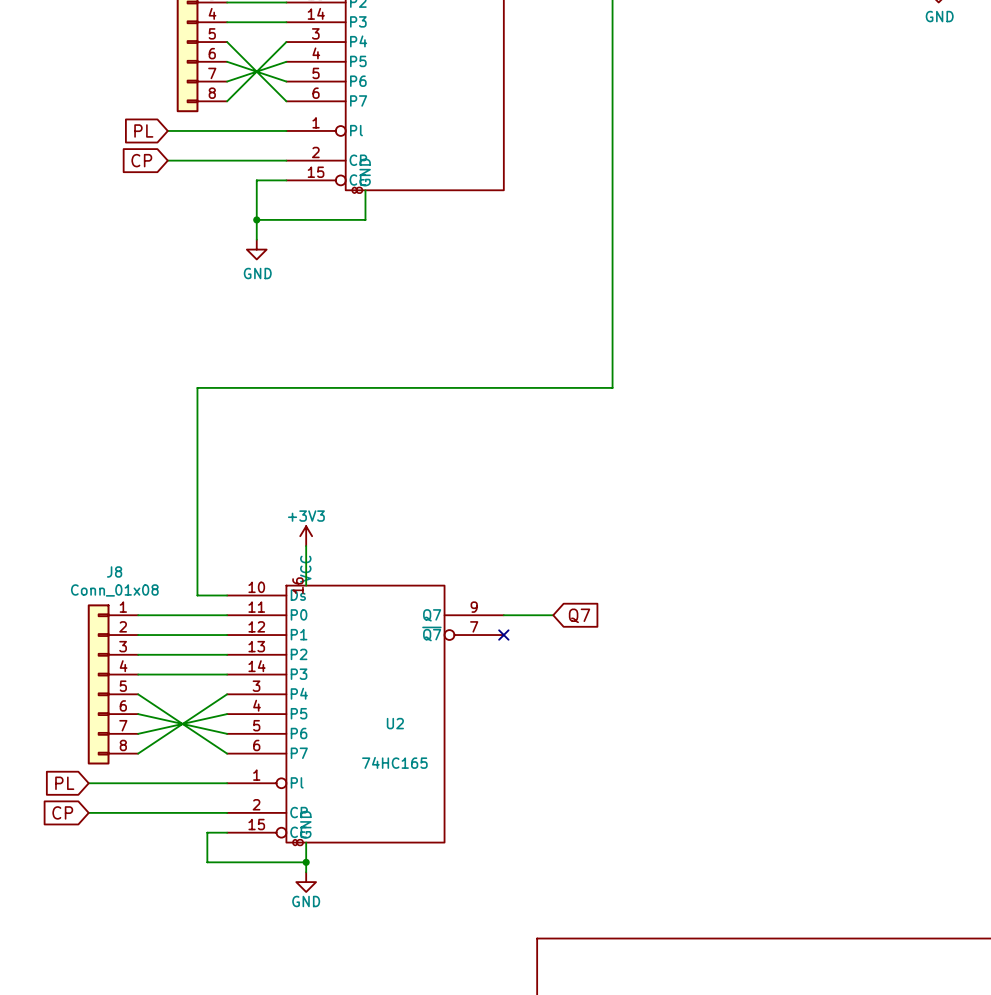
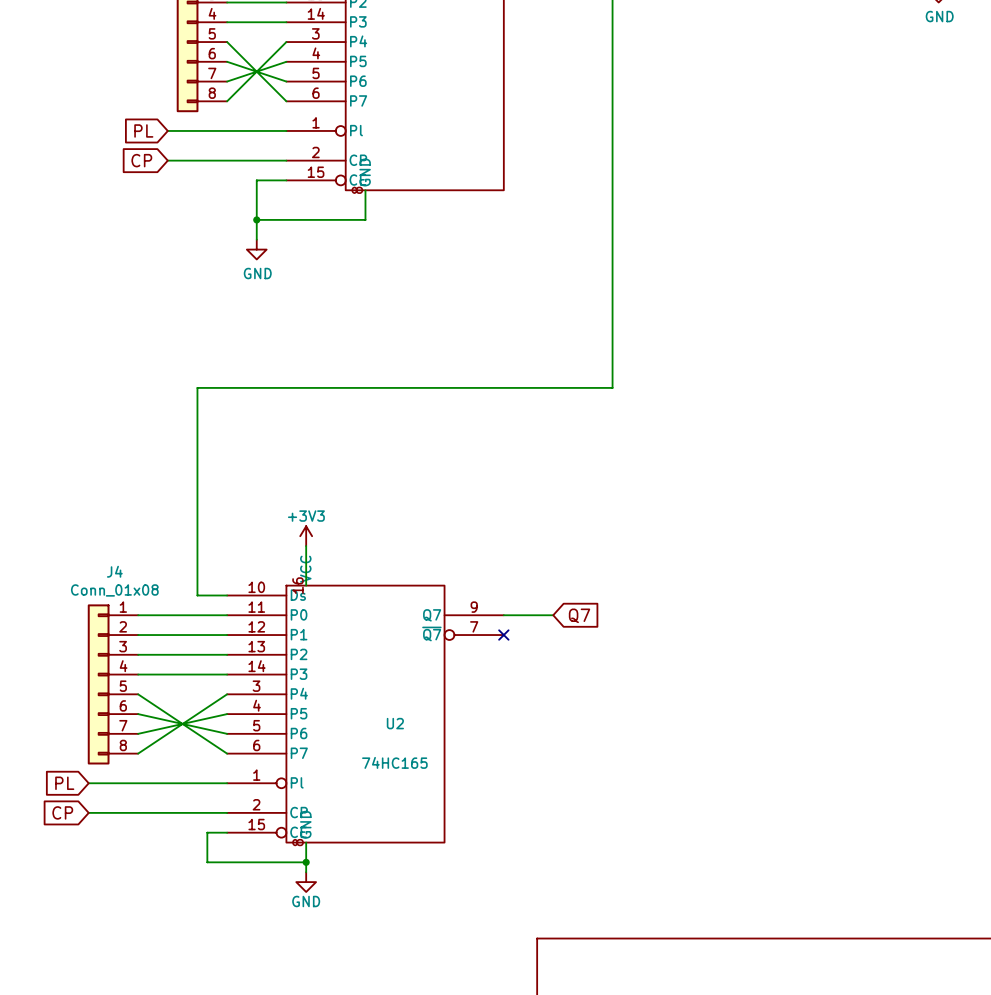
J8 name: J8 (114, 571) -> J4 (114, 571)

